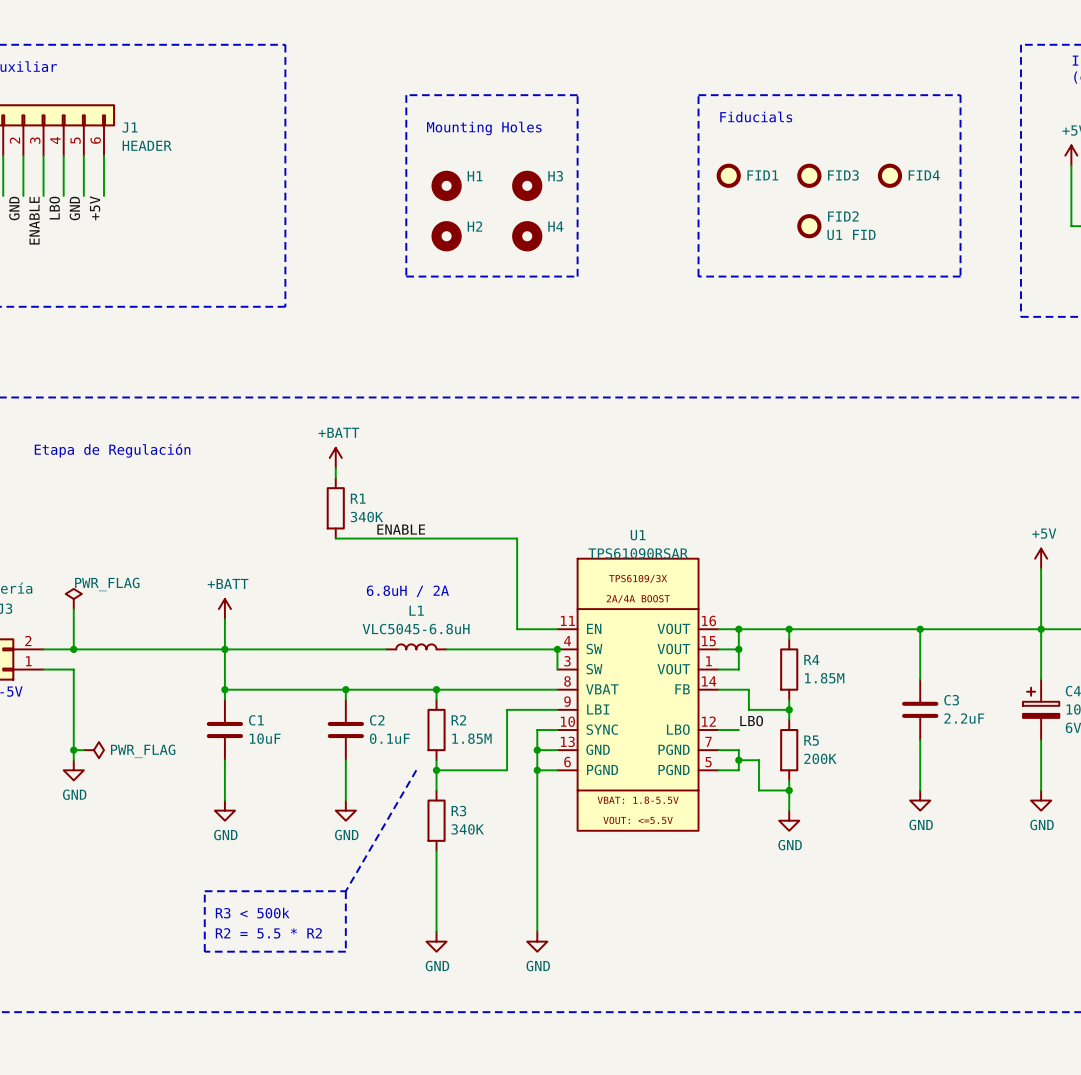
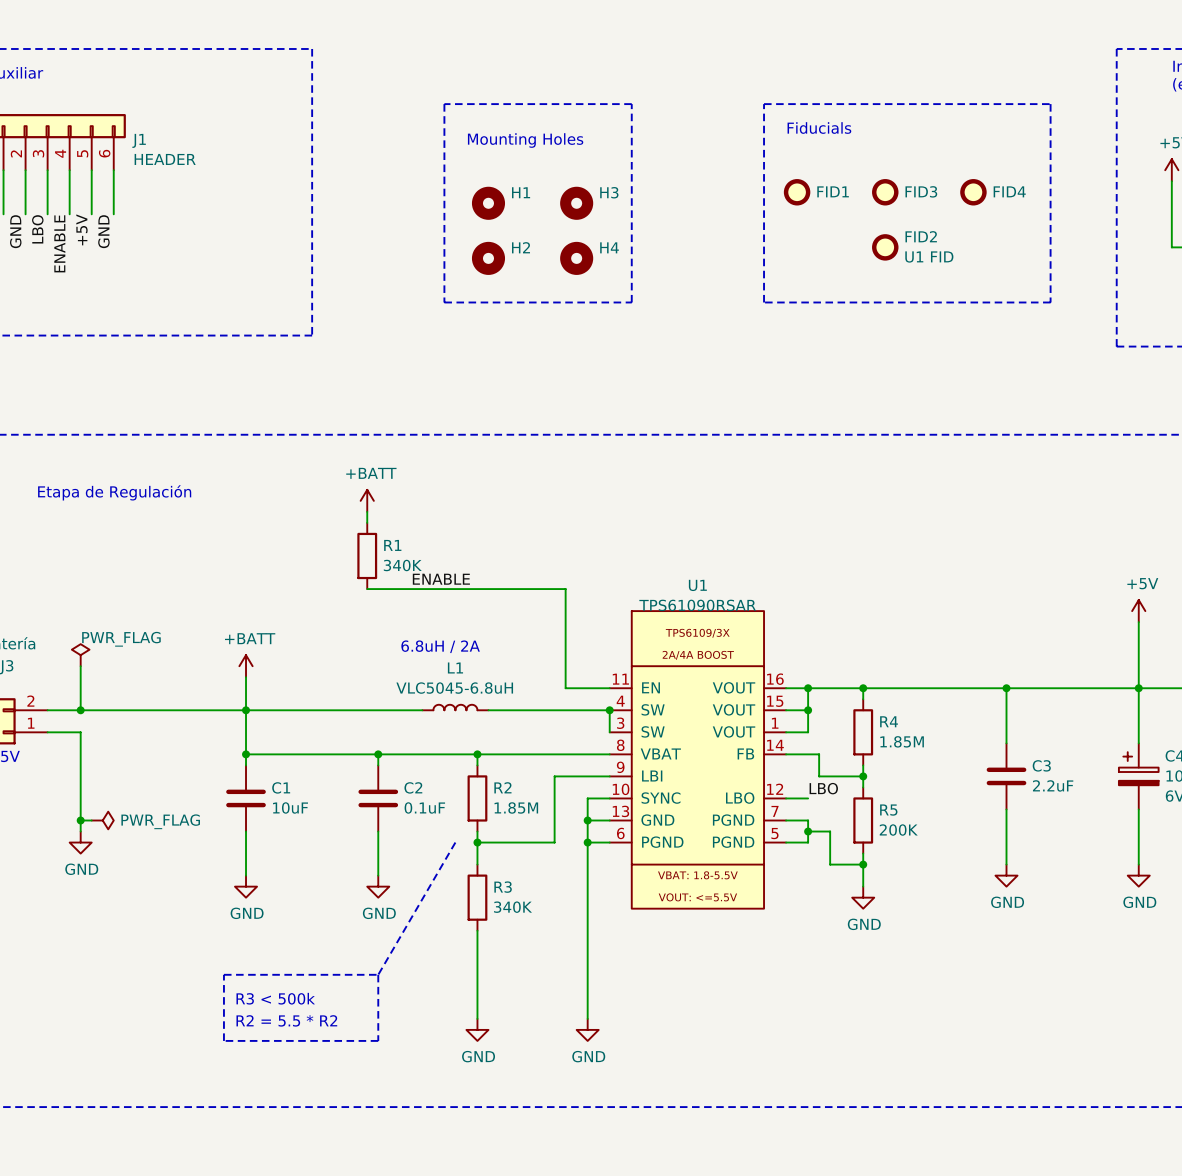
label: LBO (54, 208) -> ENABLE (59, 243)
label: GND (74, 208) -> +5V (81, 229)
label: +5V (95, 208) -> GND (103, 231)
label: ENABLE (34, 220) -> LBO (37, 229)

